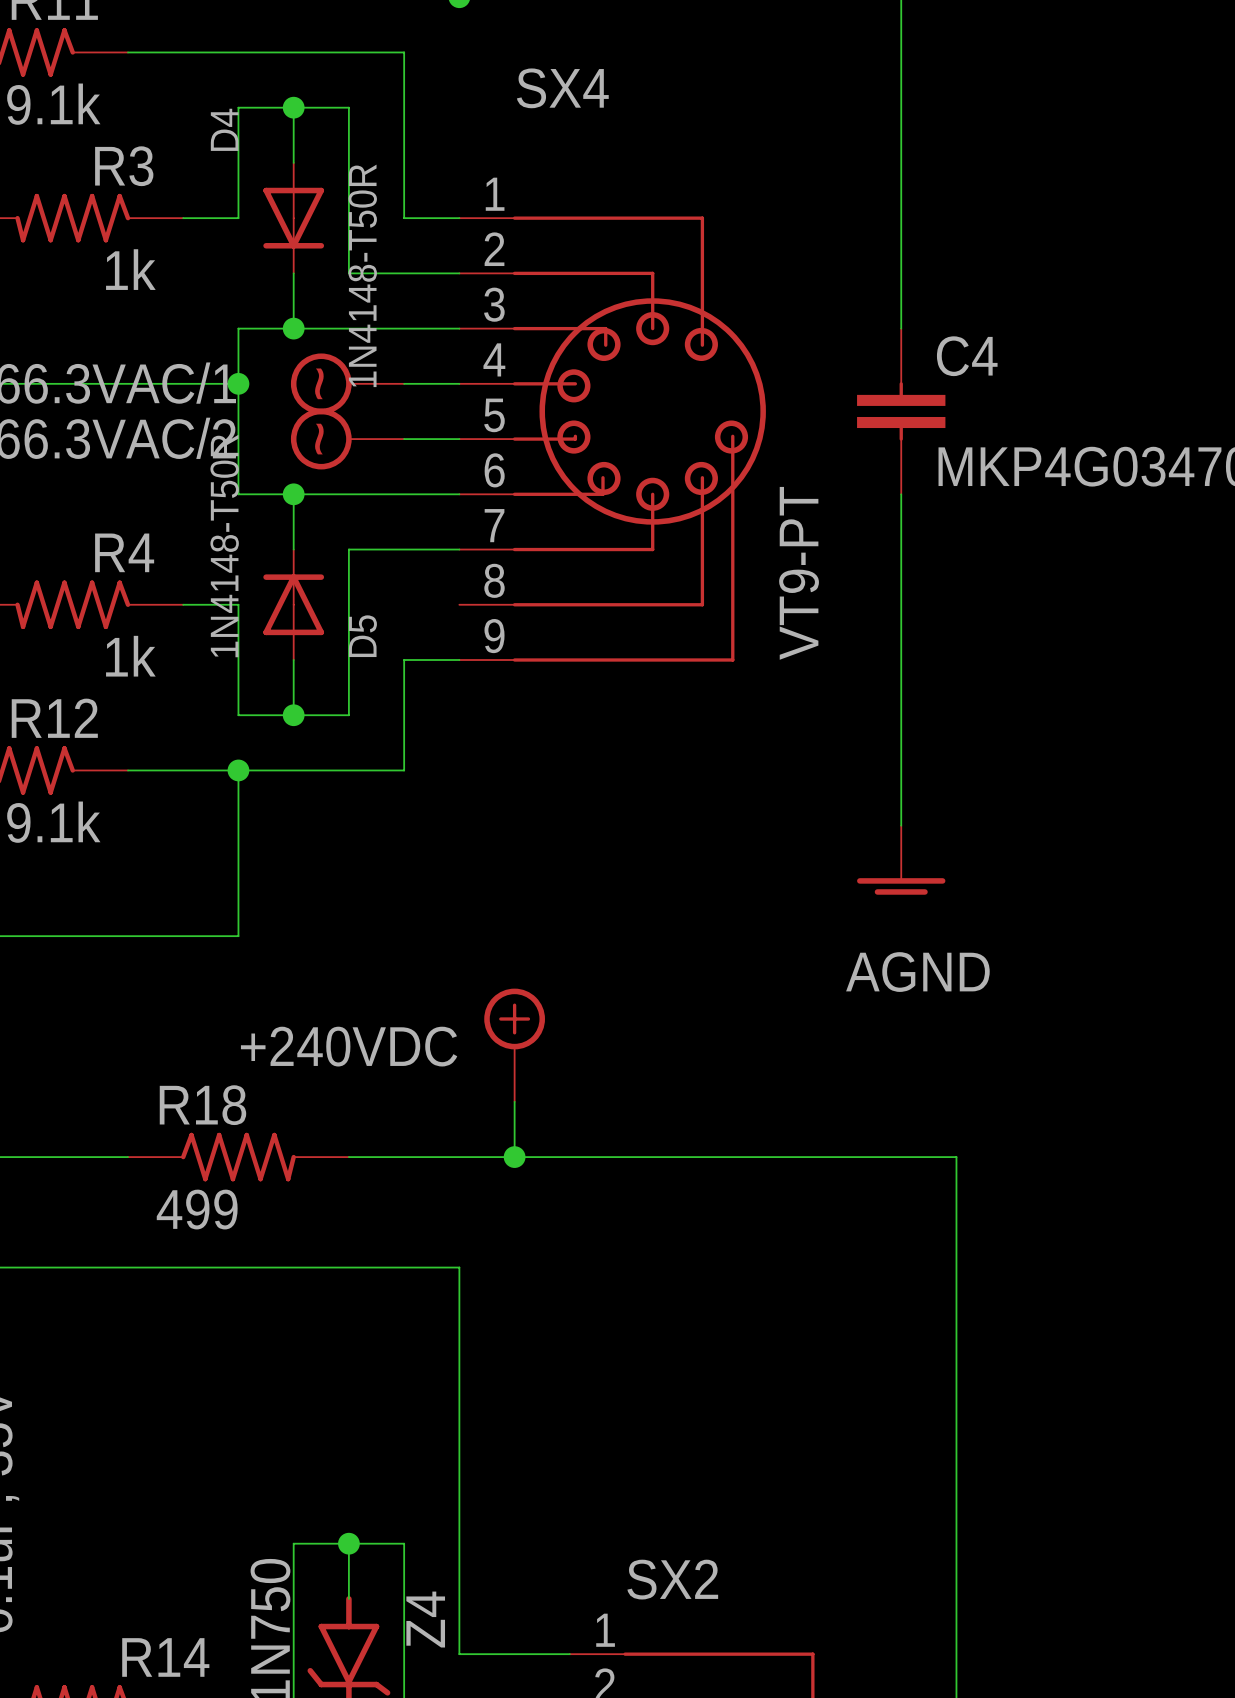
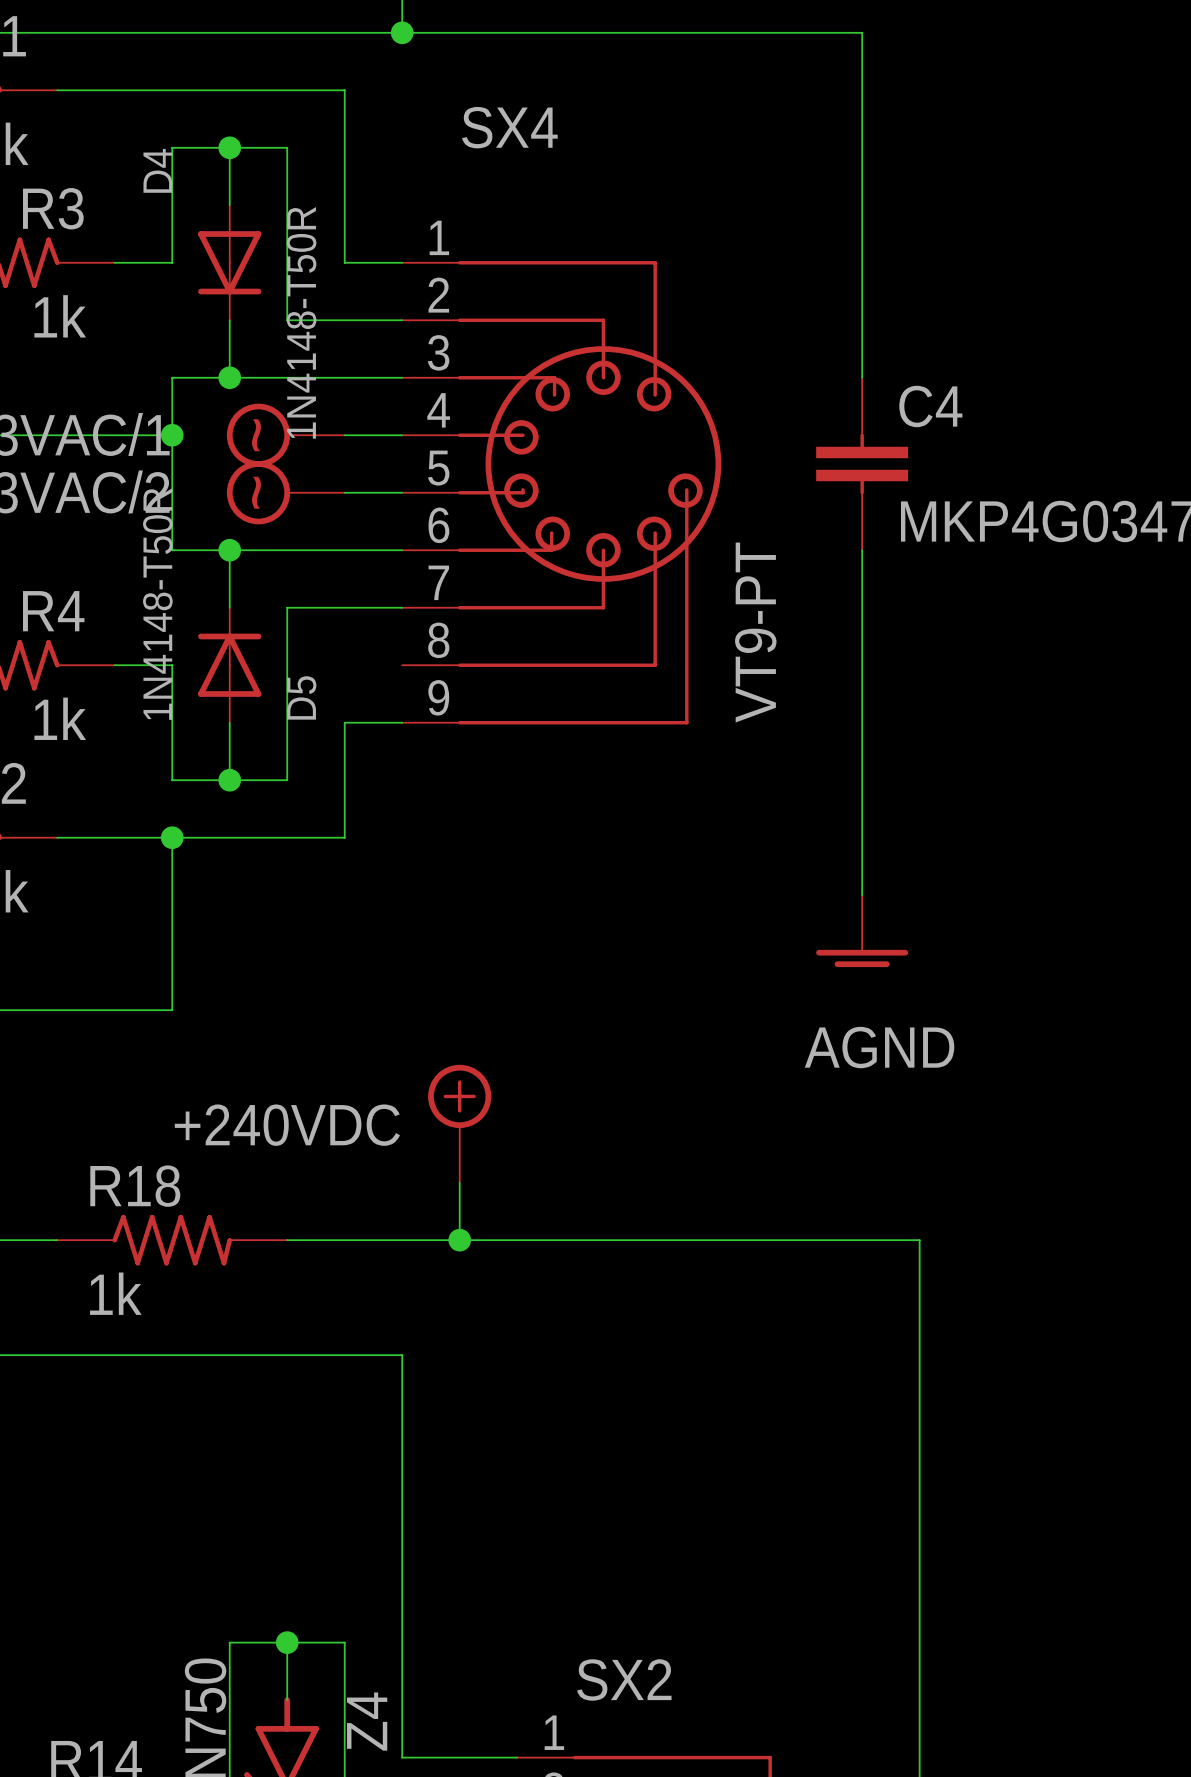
R18 value: 499 (197, 1209) -> 1k (115, 1293)

